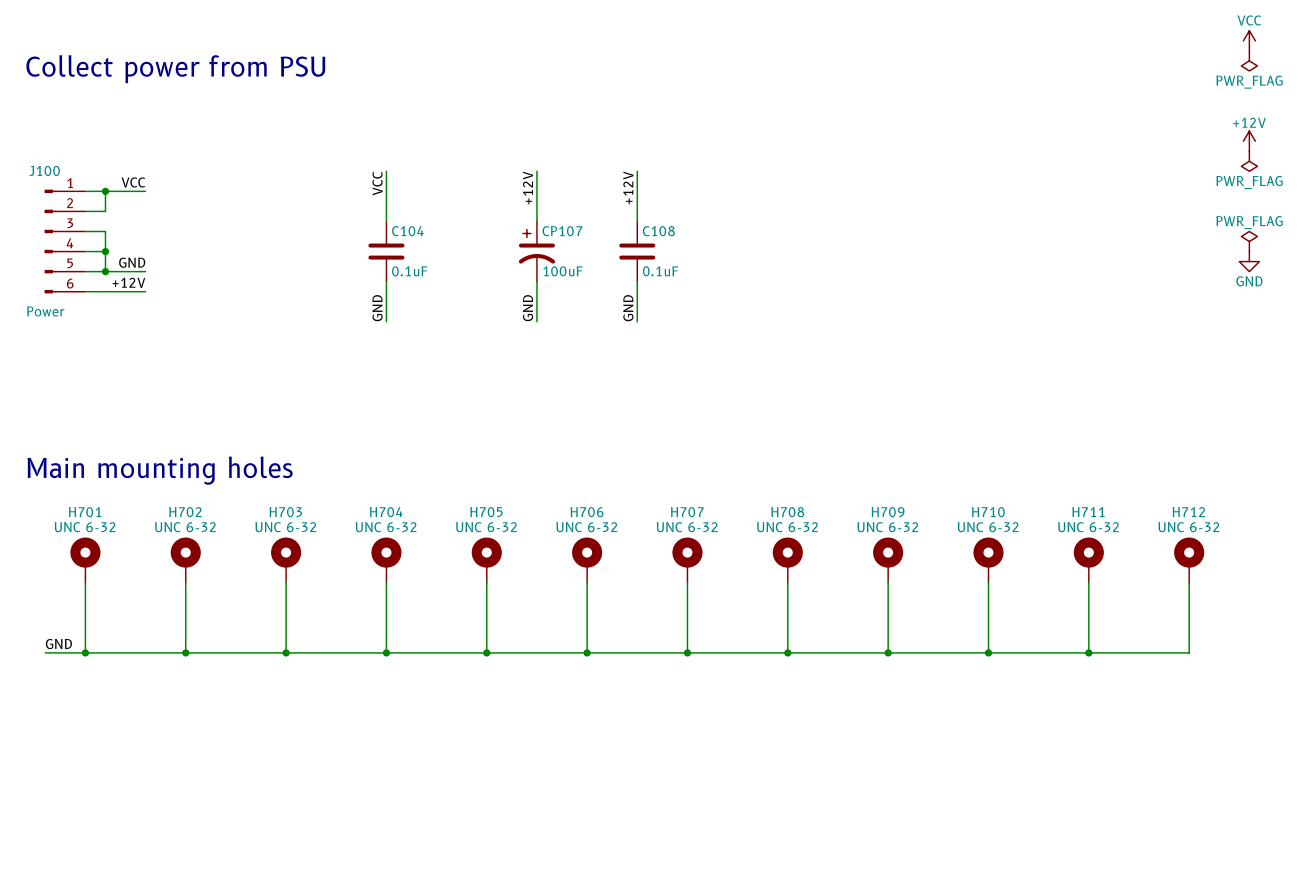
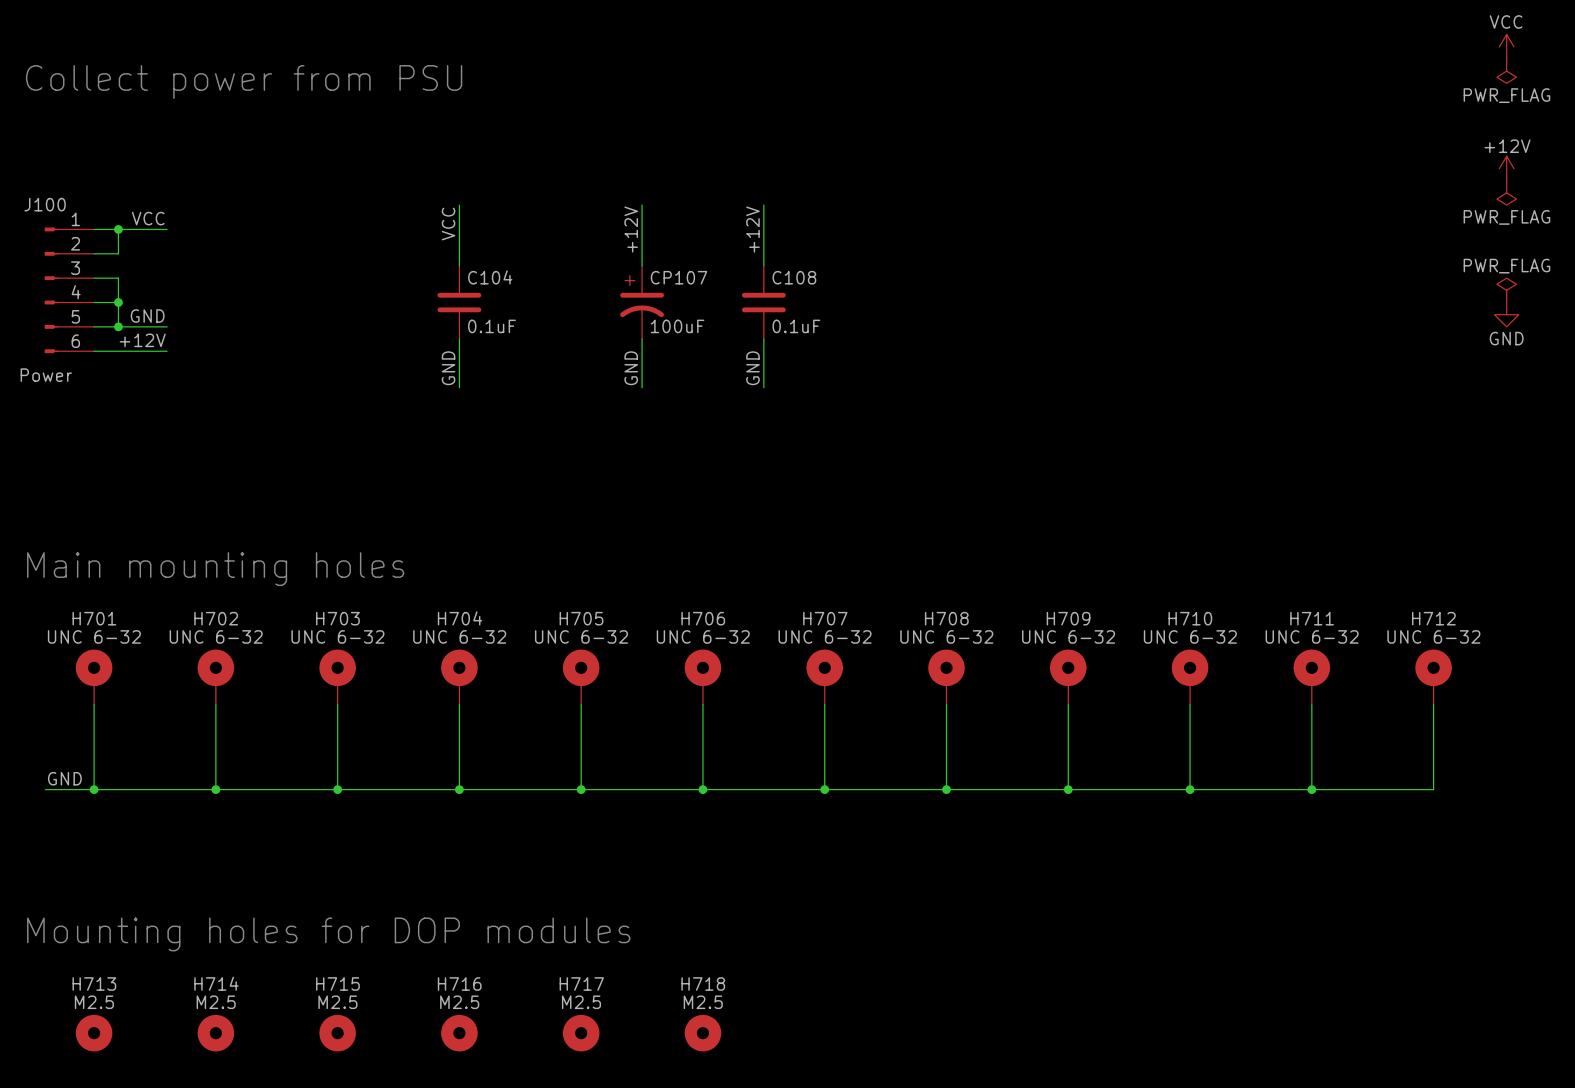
text: none -> Mounting holes for DOP modules (328, 934)
H713: none -> M2.5 (94, 1033)
H714: none -> M2.5 (215, 1033)
H715: none -> M2.5 (337, 1033)
H716: none -> M2.5 (459, 1033)
H717: none -> M2.5 (581, 1033)
H718: none -> M2.5 (702, 1033)

